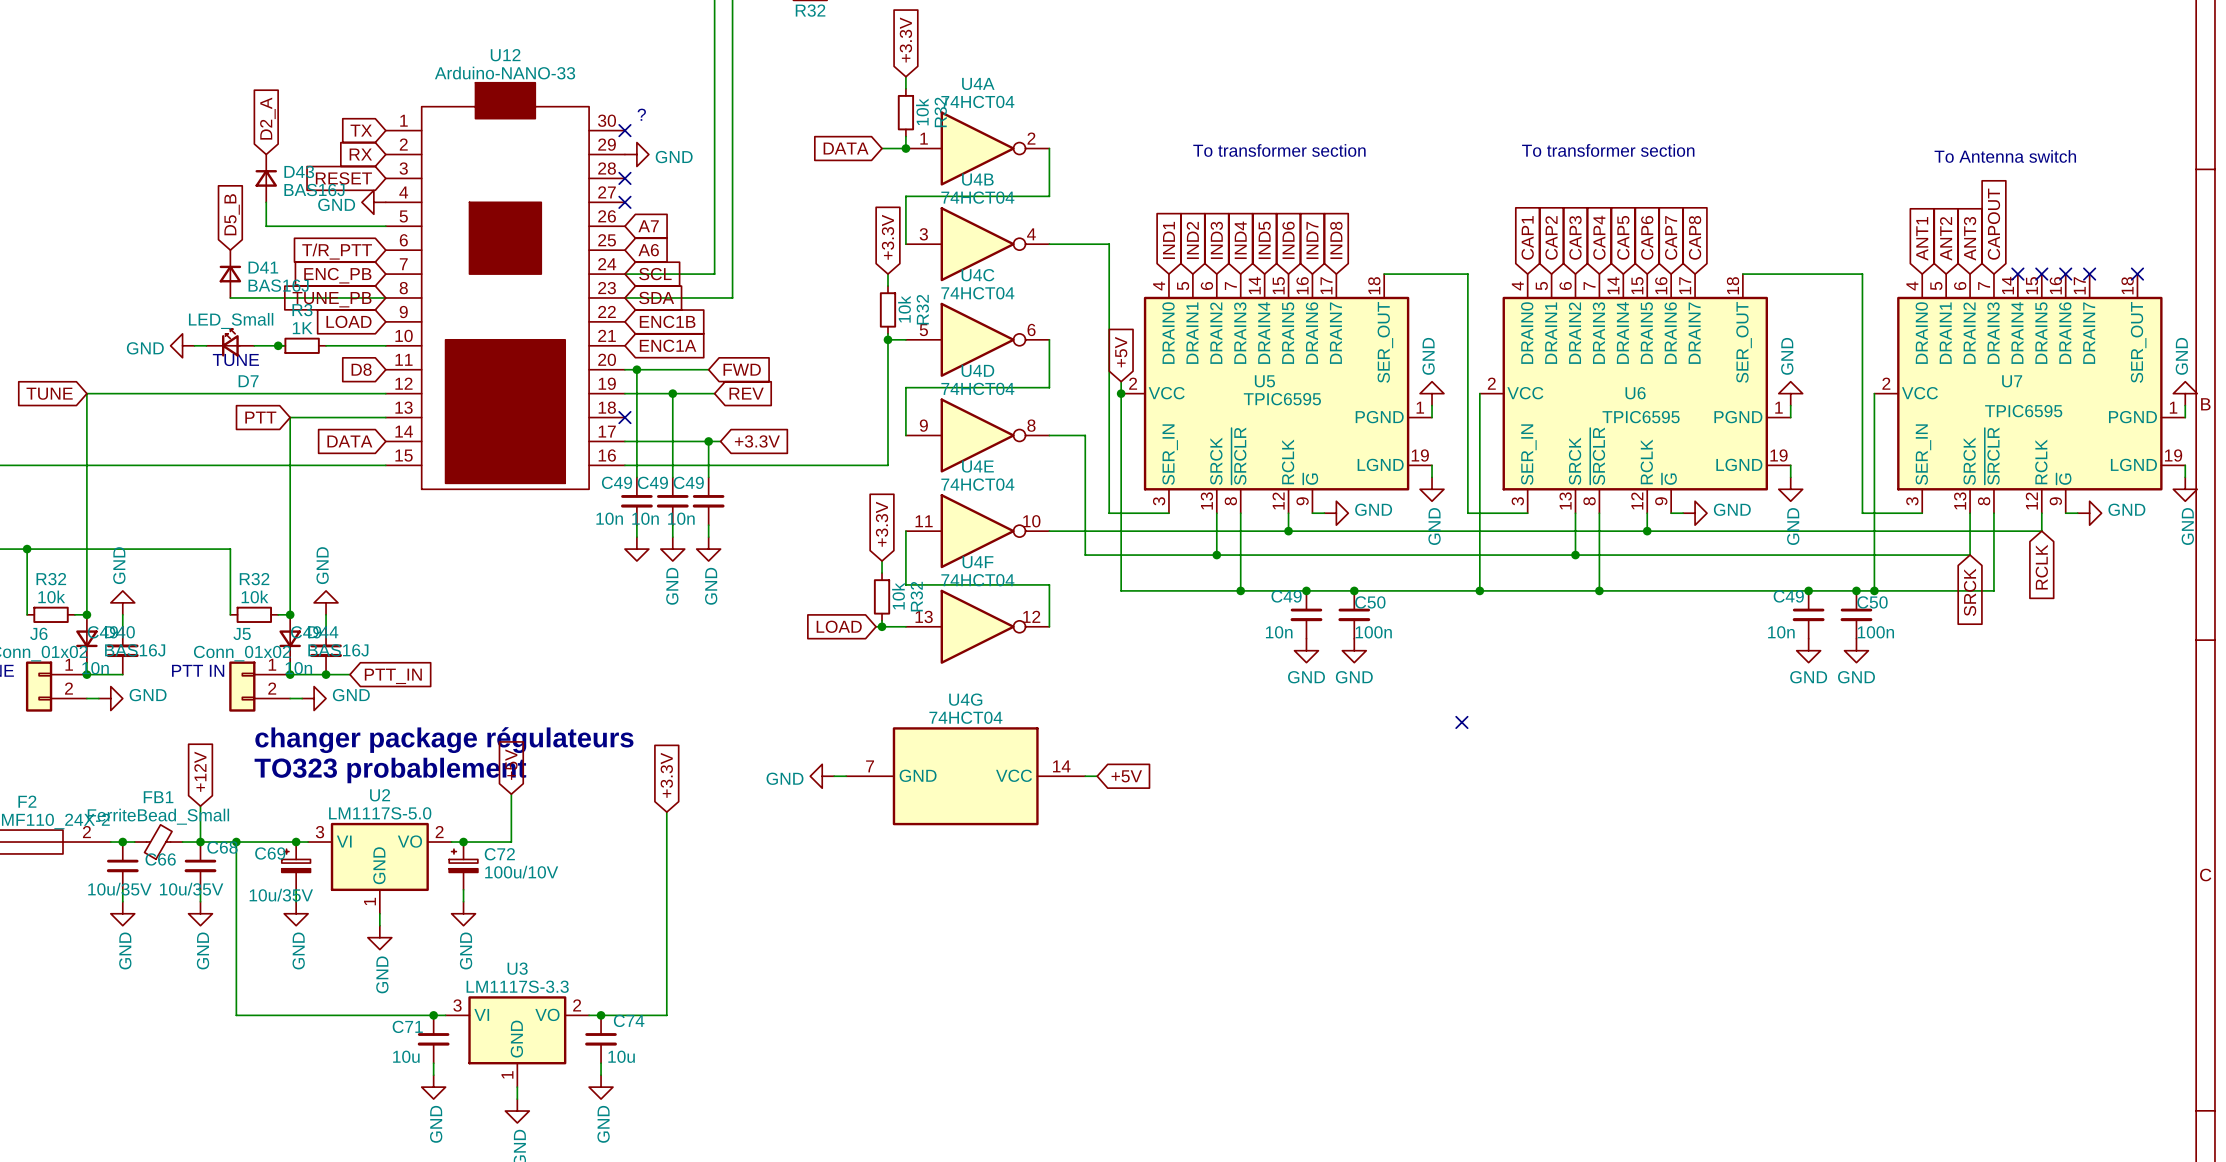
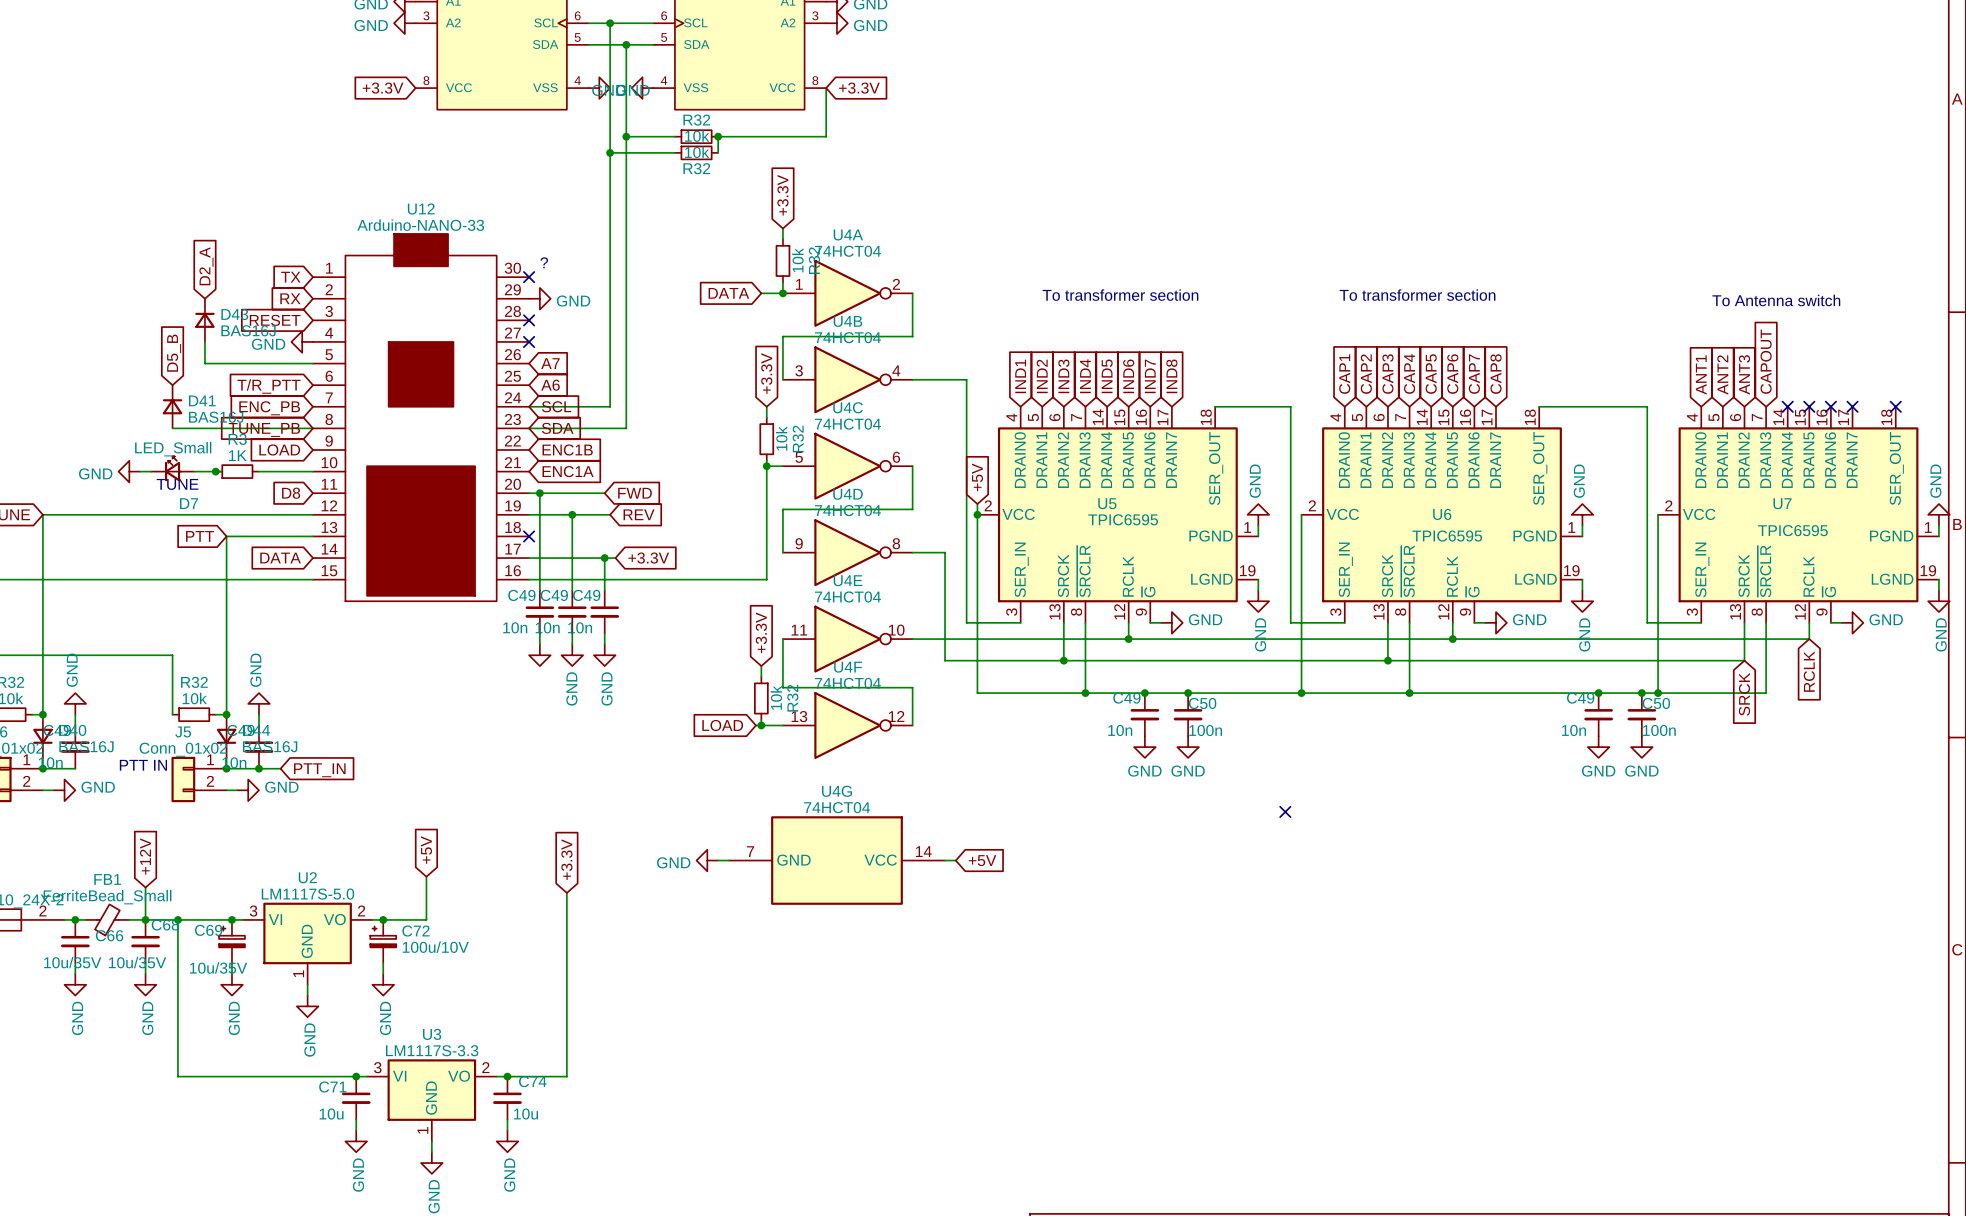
text: changer package régulateurs (444, 740) -> none
text: TO323 probablement (390, 770) -> none

